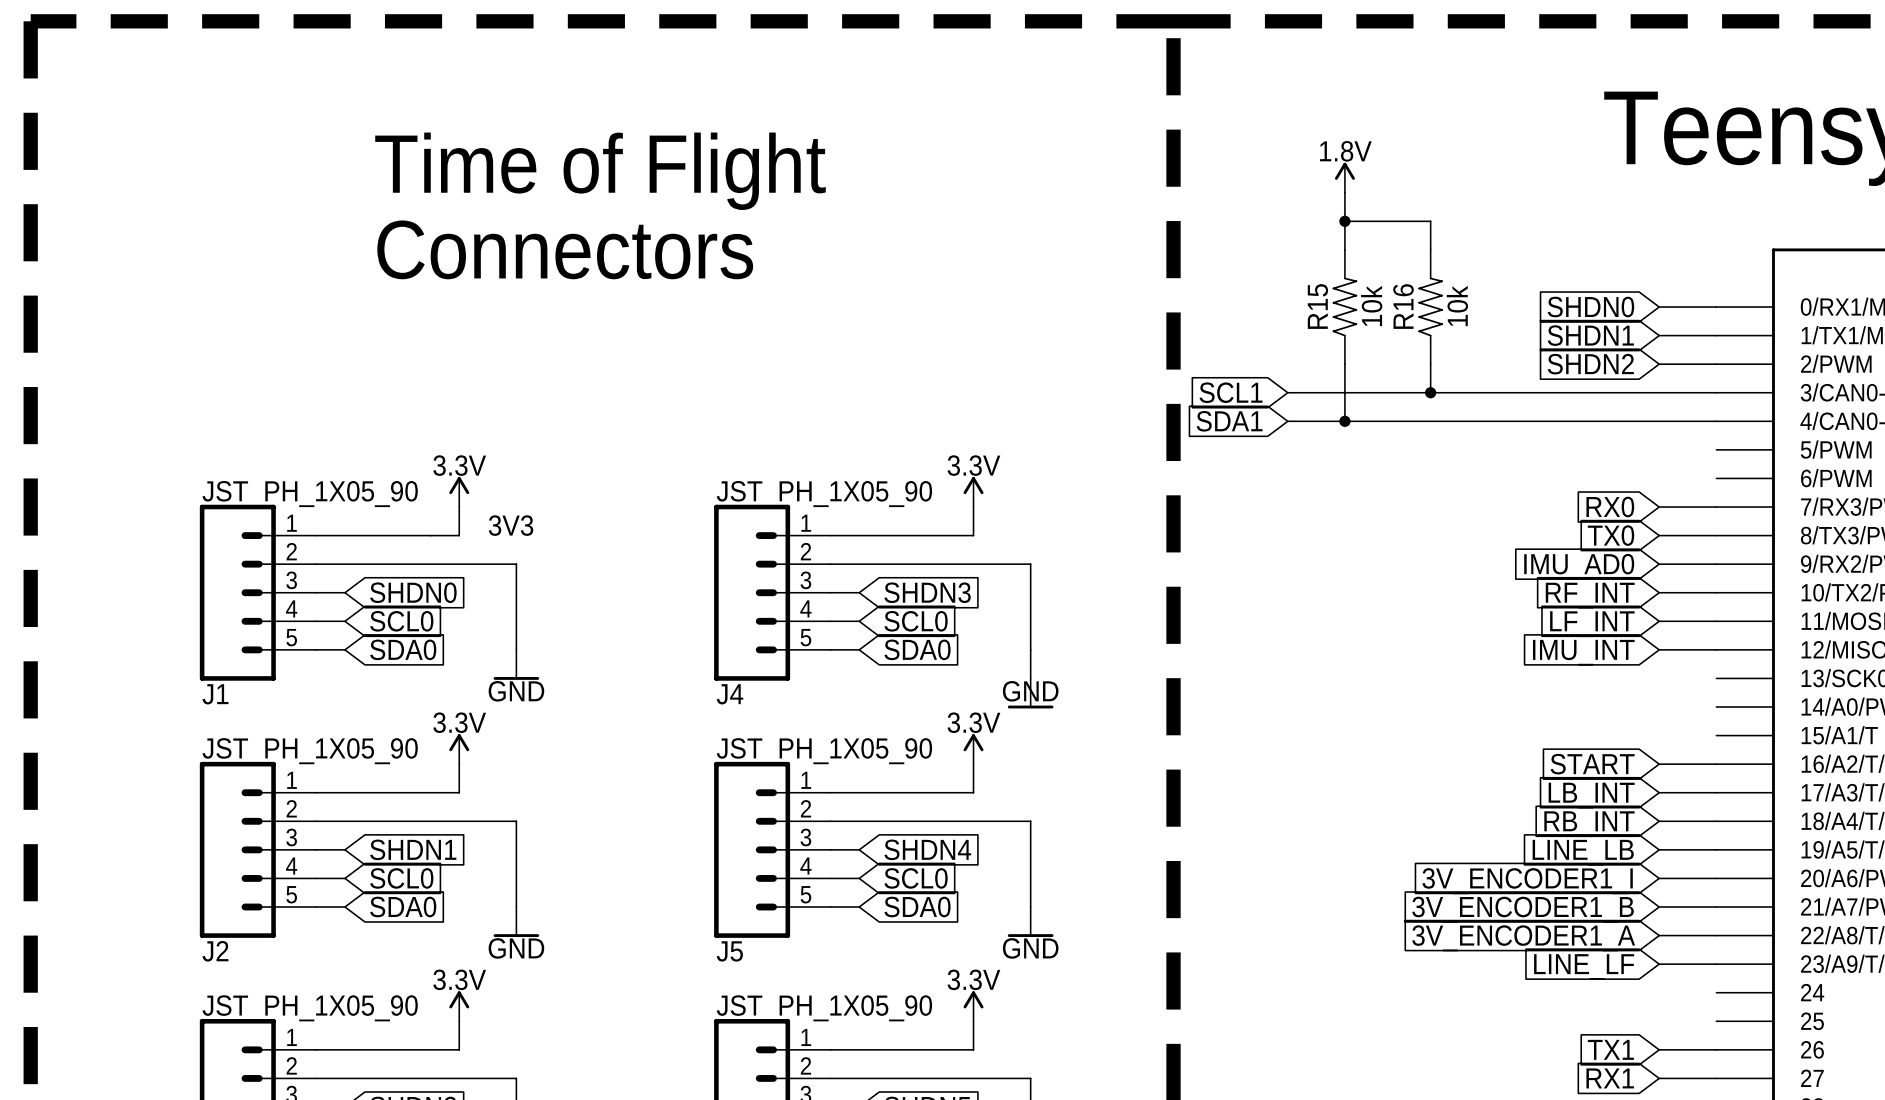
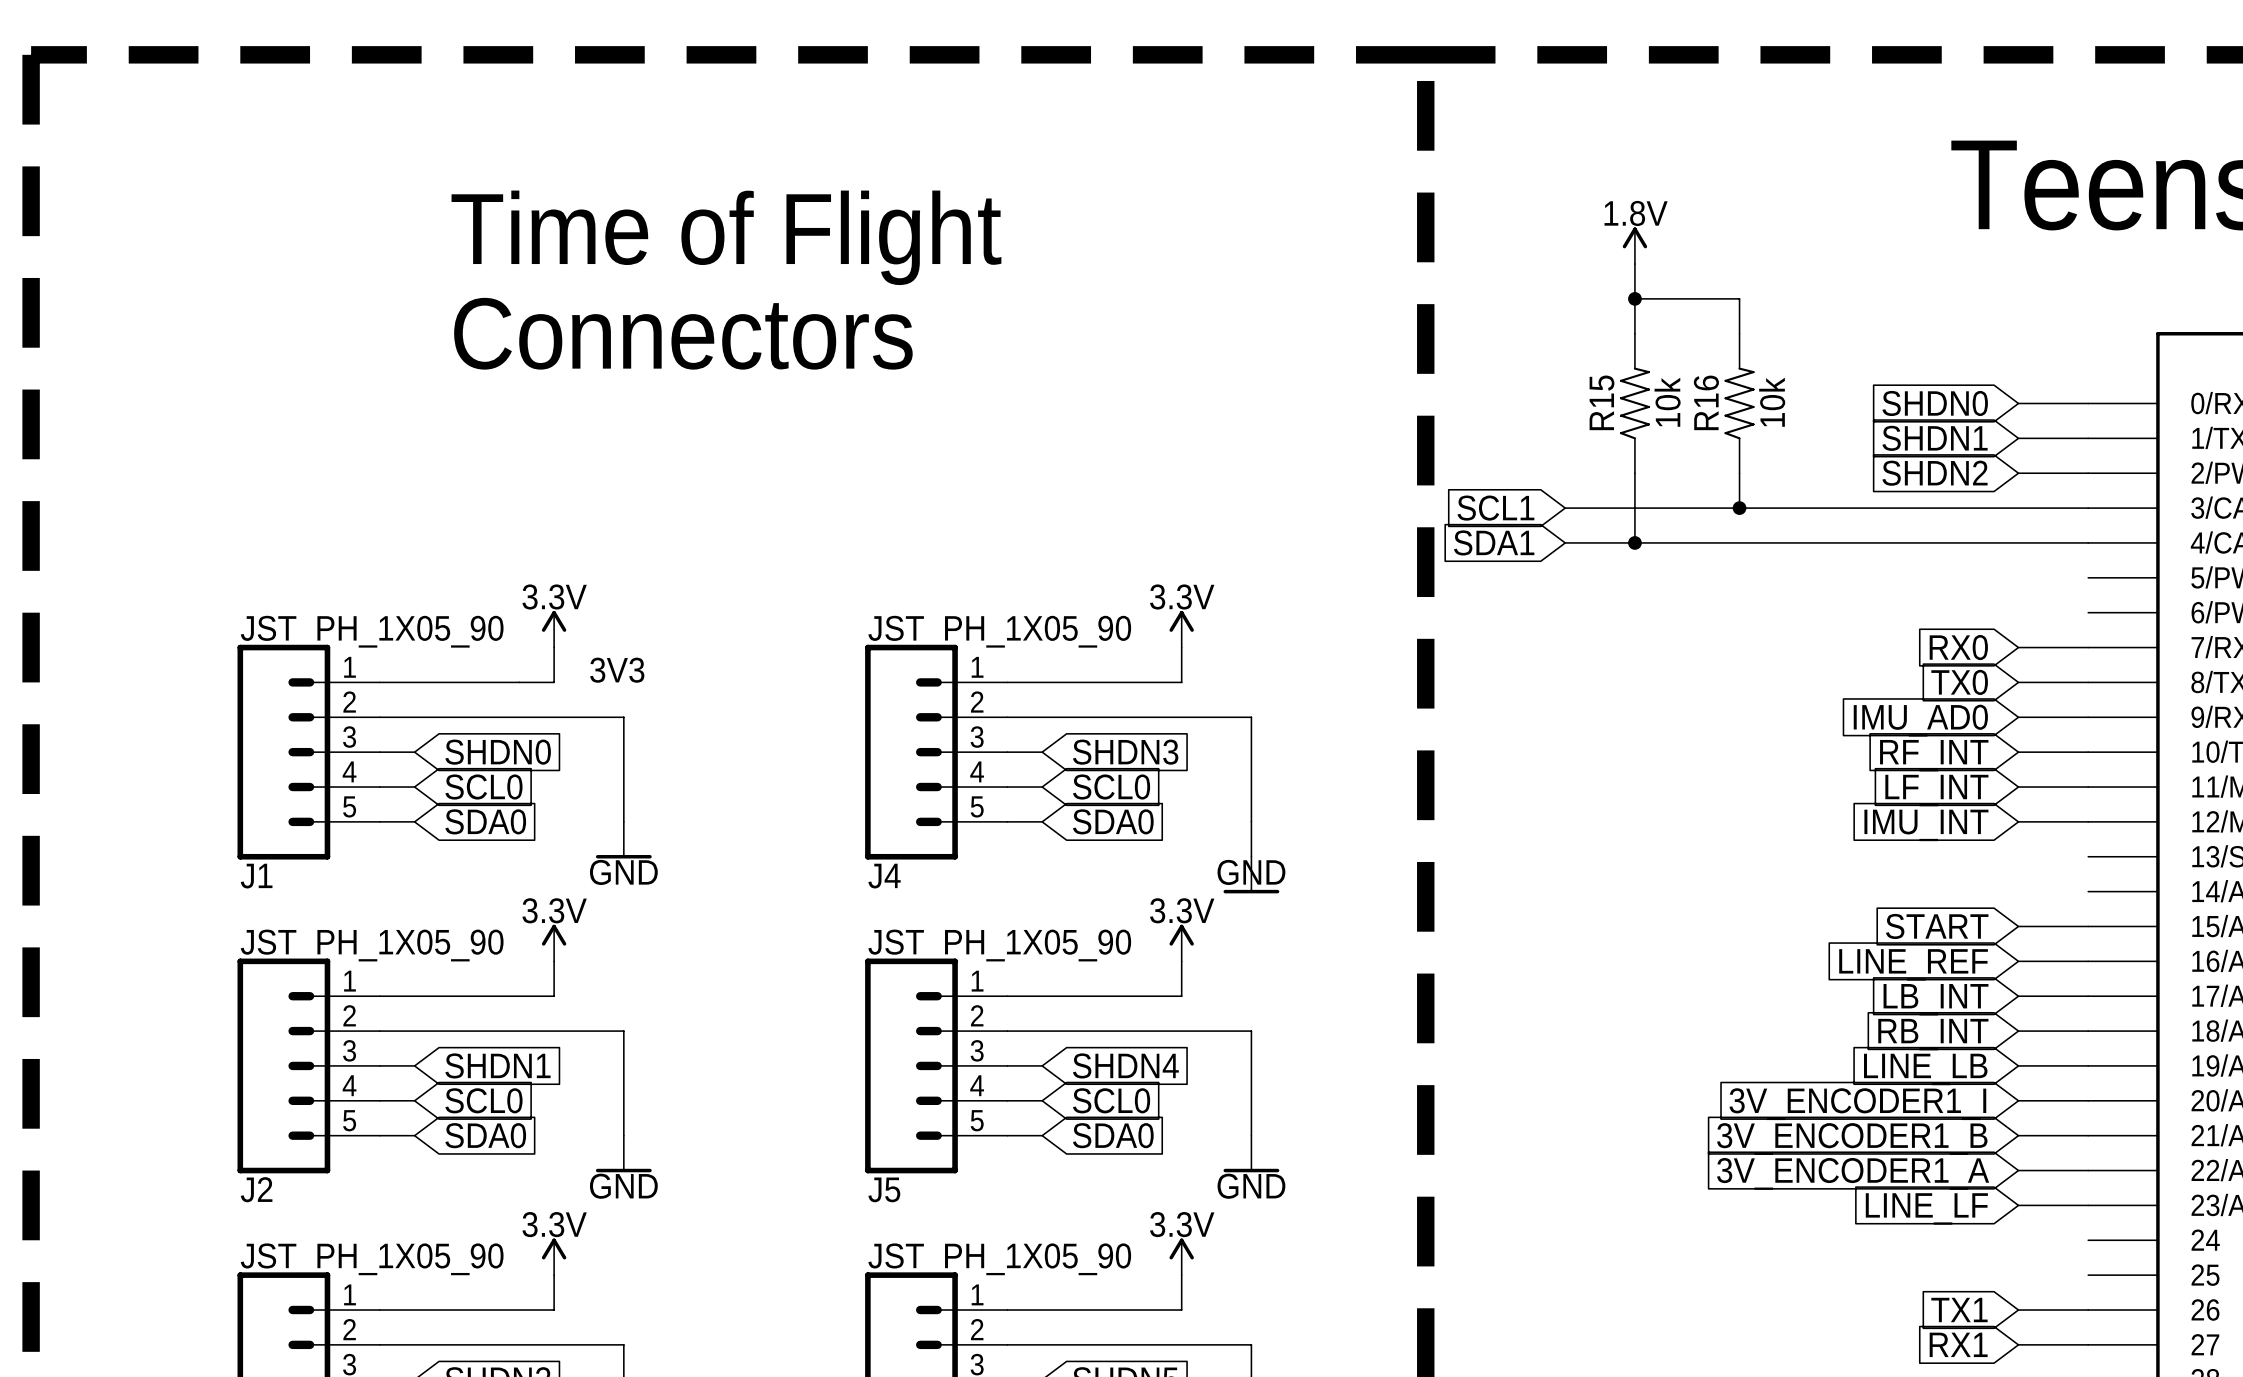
global label: none -> START (1937, 926)
wire: none -> (2018, 926) (2088, 926)
global label: START (1592, 764) -> LINE_REF (1913, 964)

